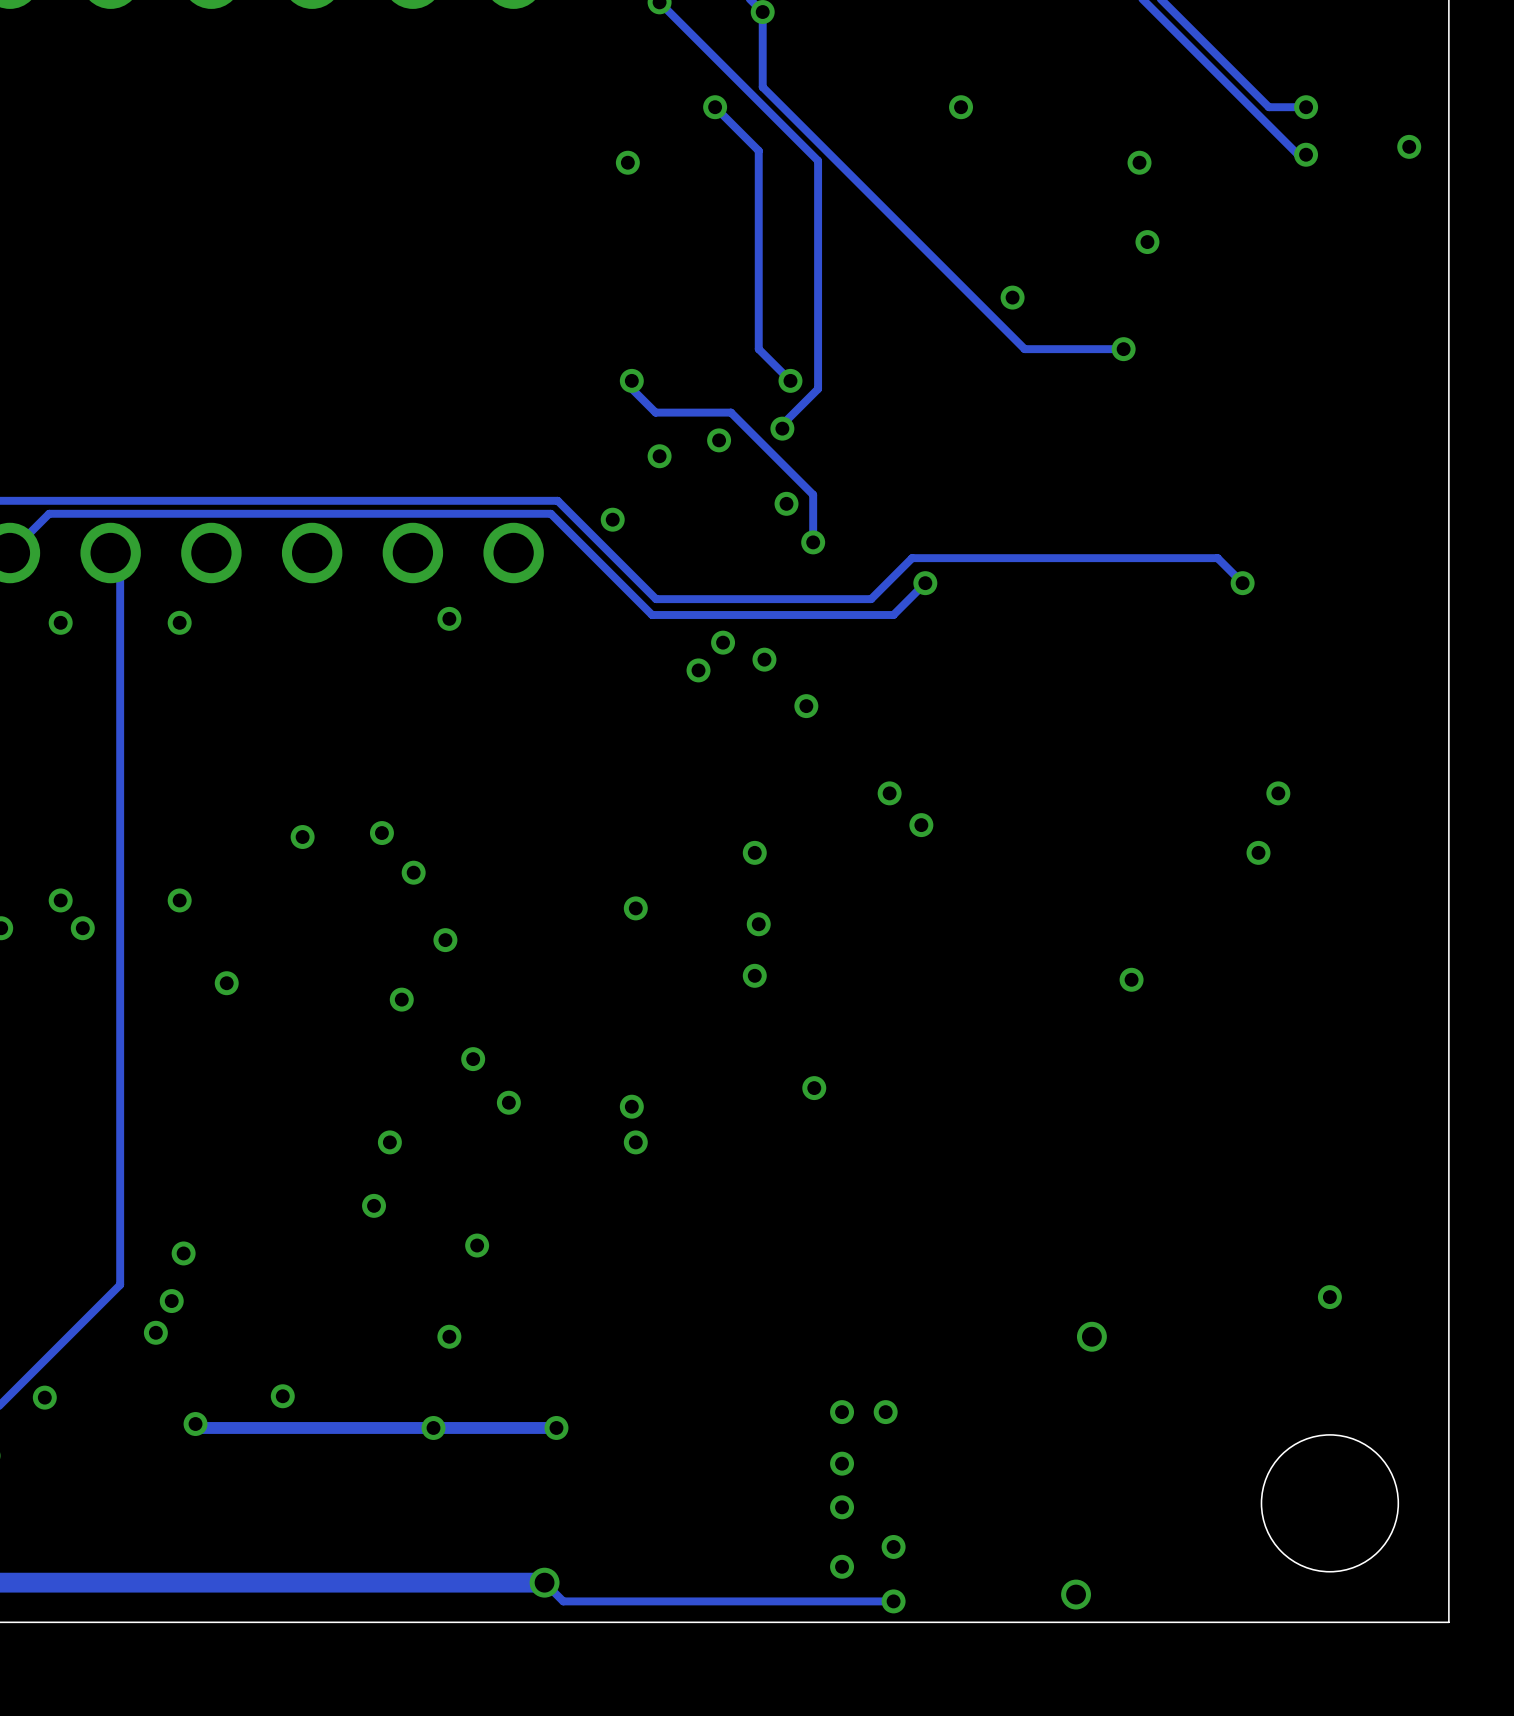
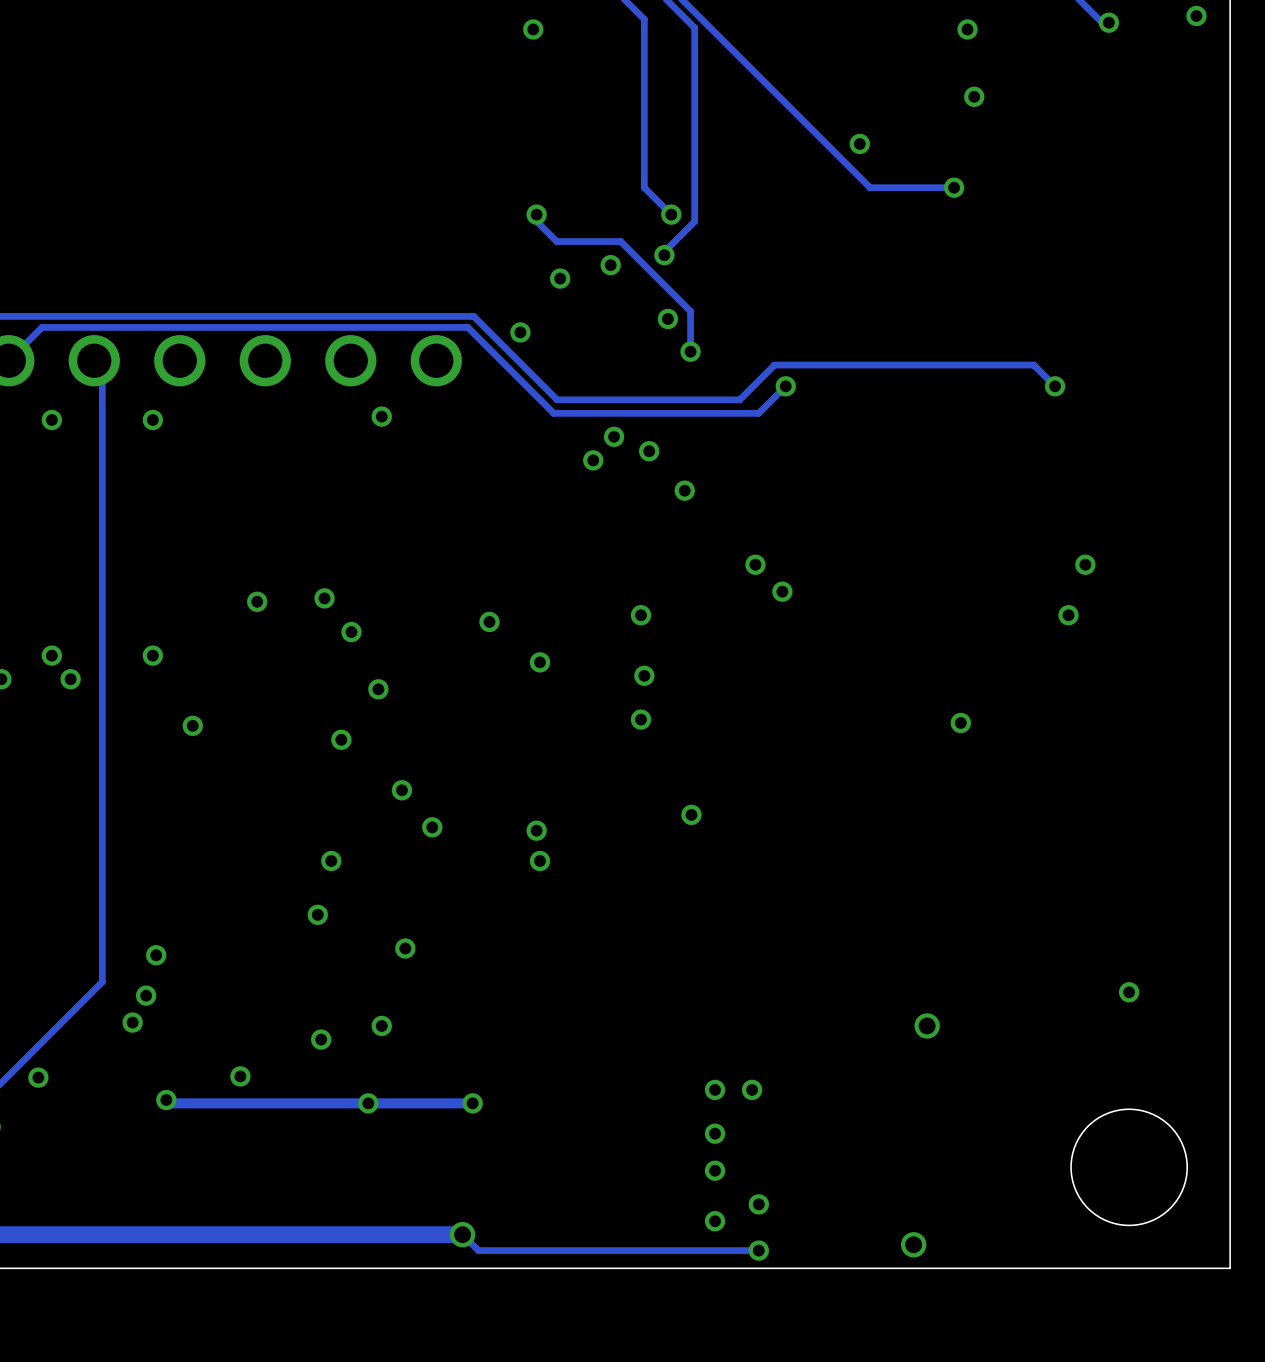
via: none -> (489, 621)
via: none -> (321, 1039)

